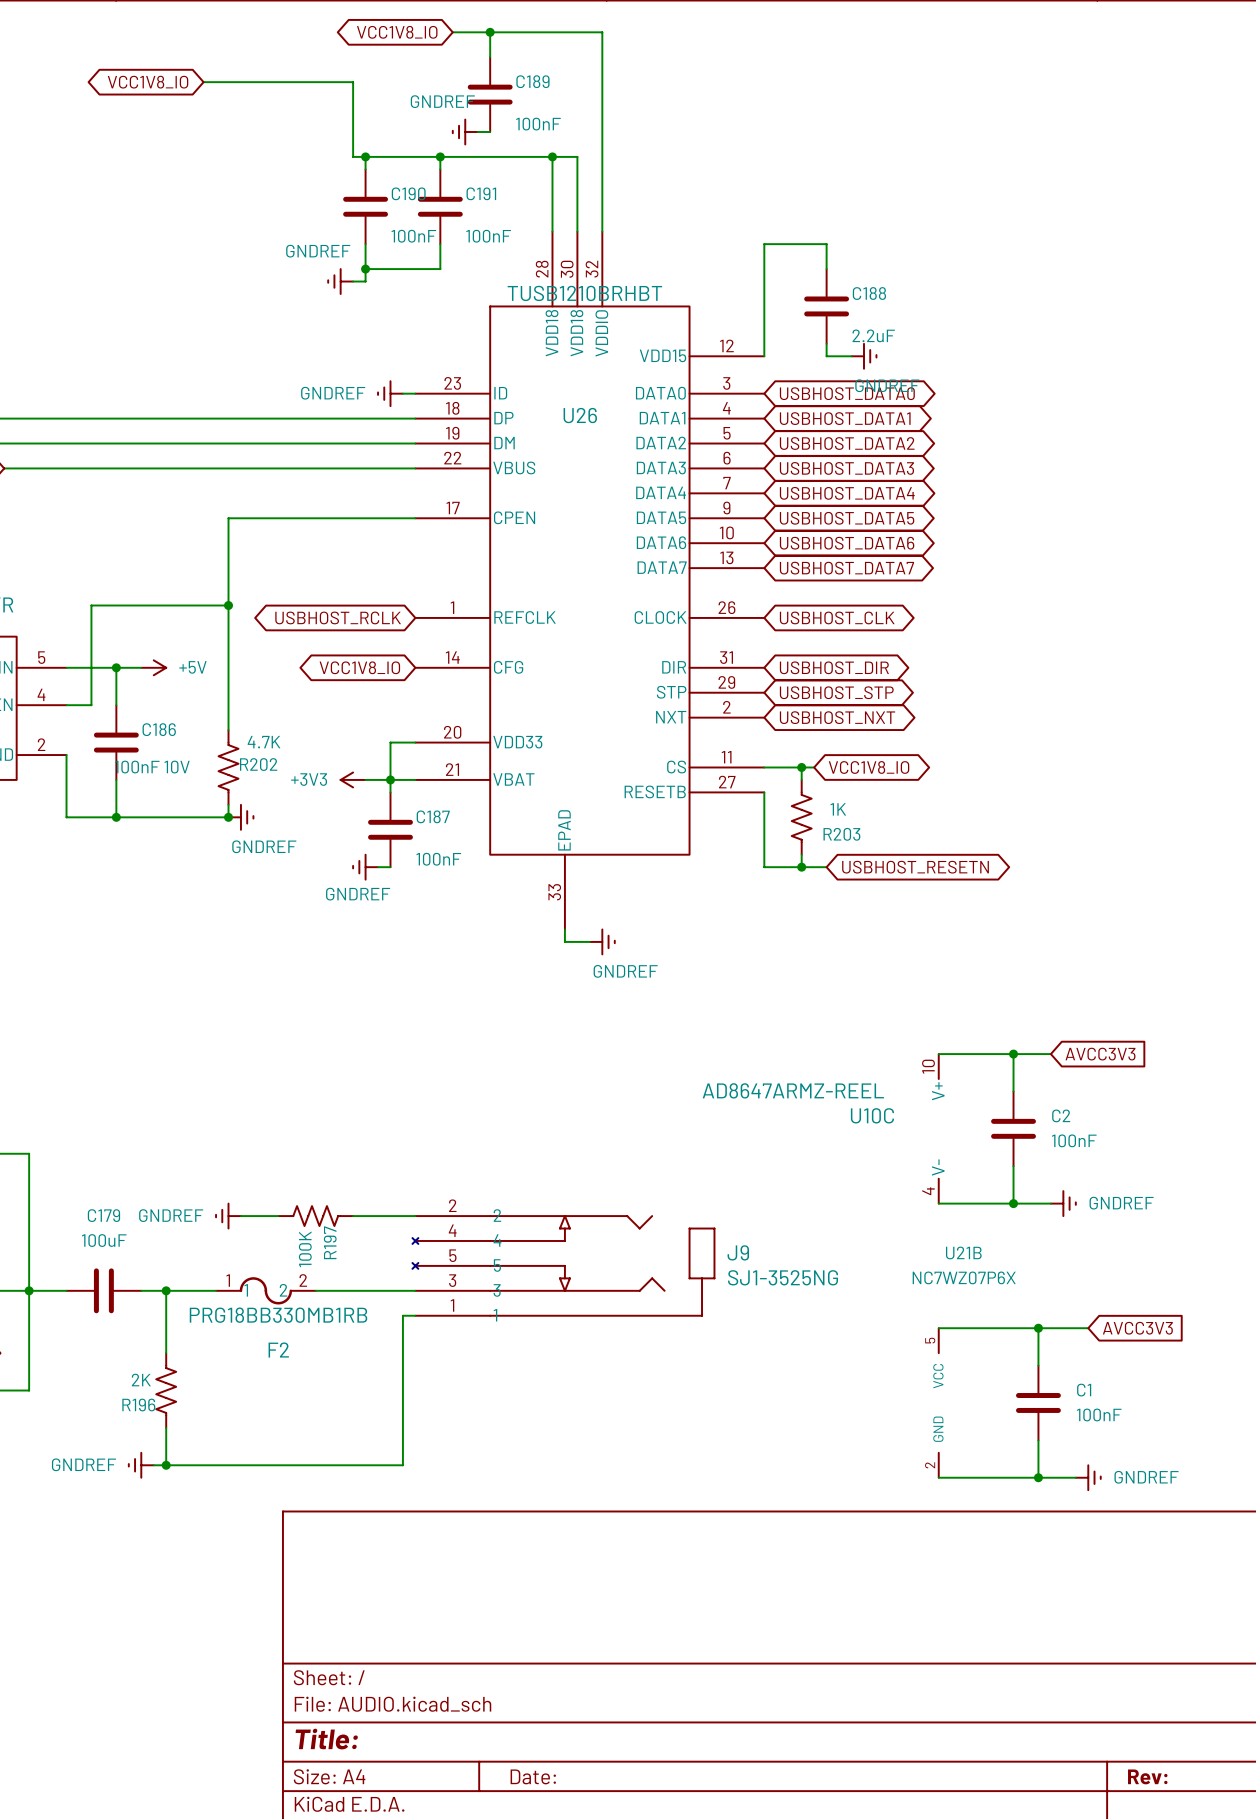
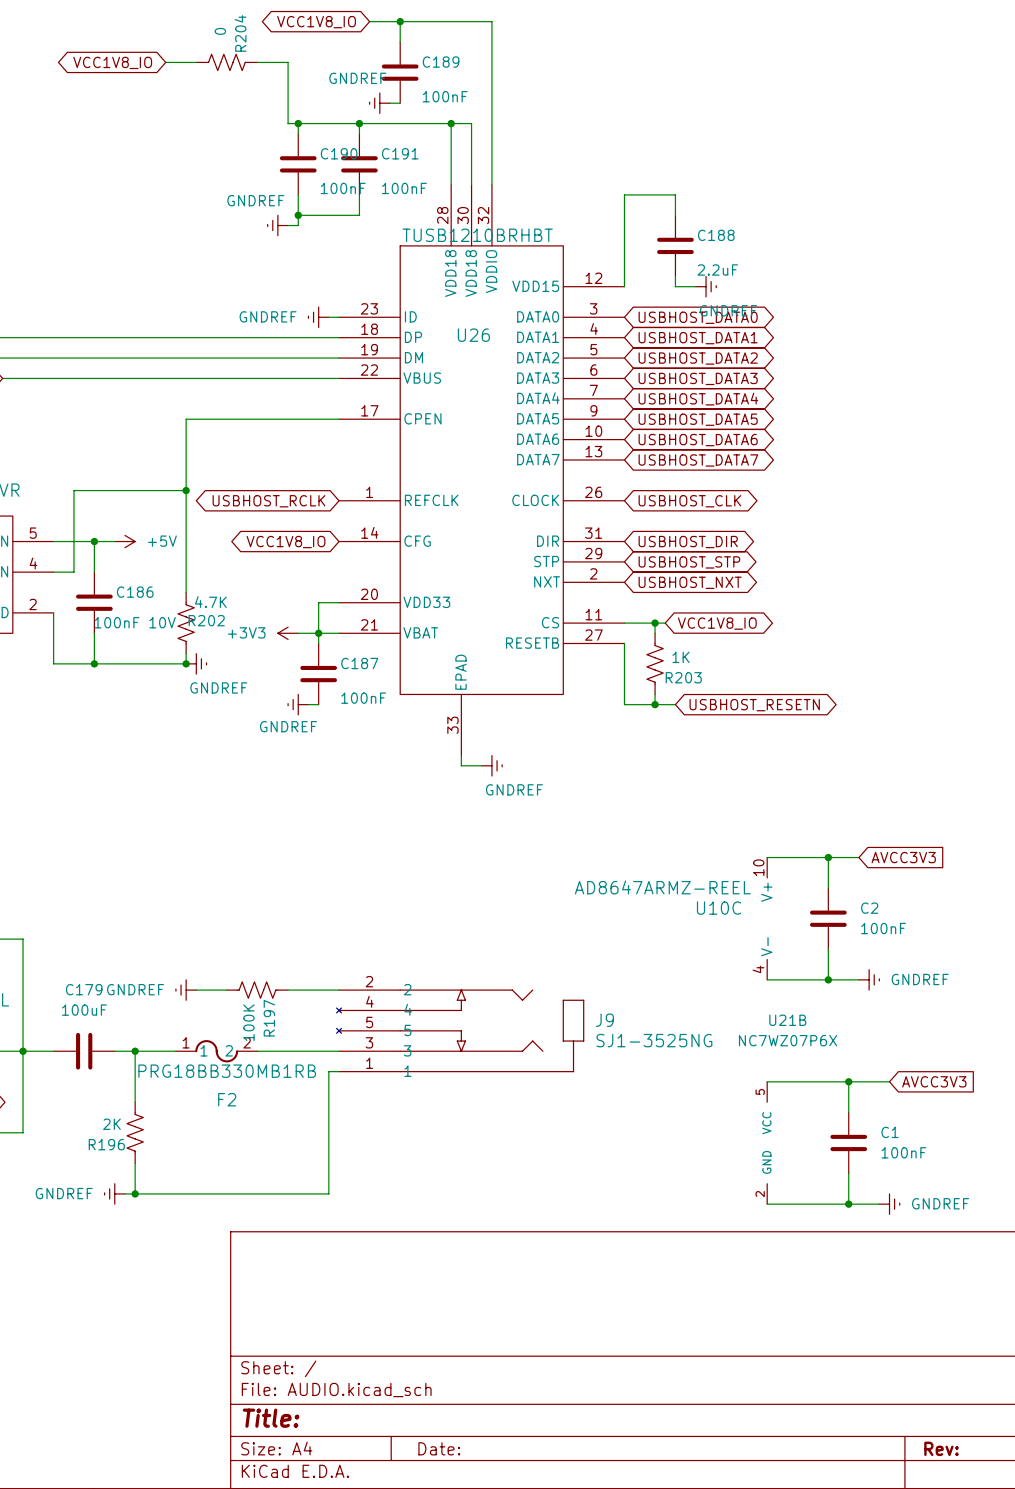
R204: none -> 0 (226, 62)

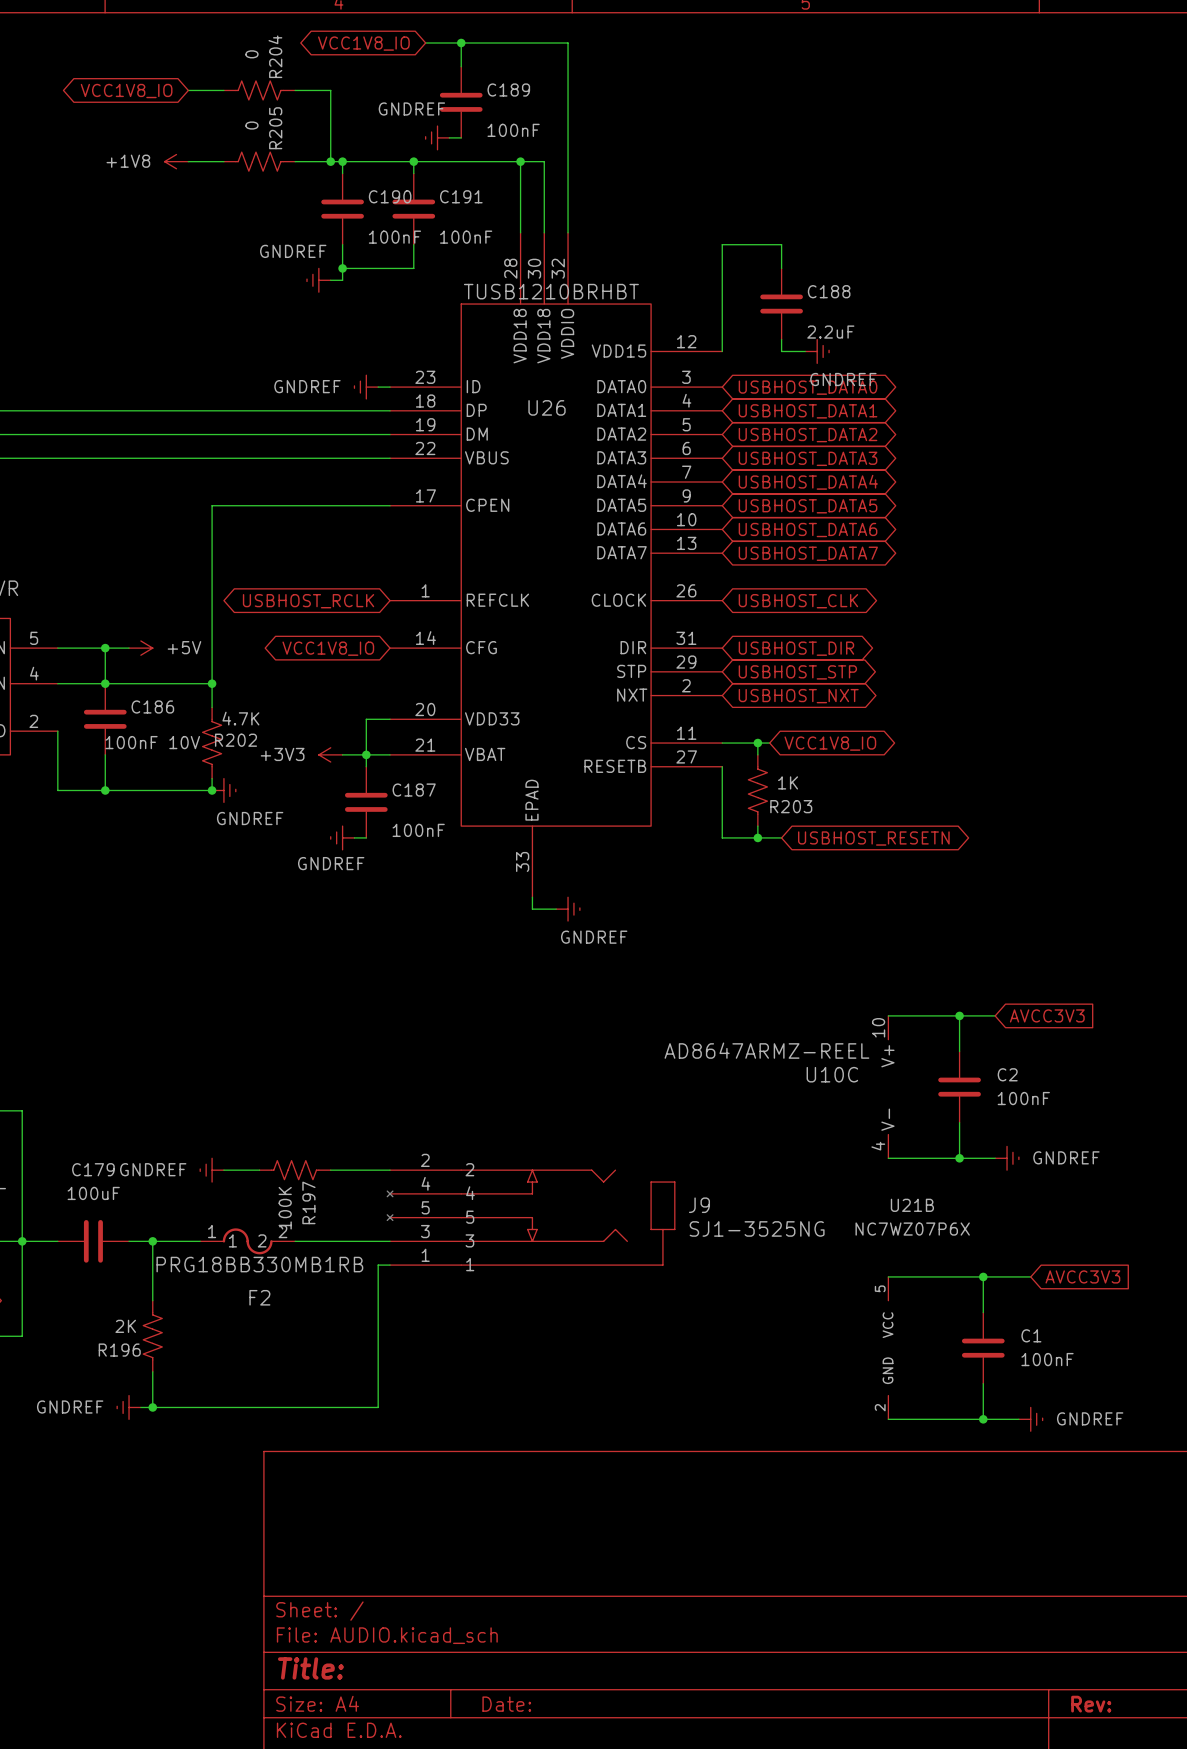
power symbol: none -> +1V8 (176, 161)
wire: none -> (188, 161) (223, 161)
R205: none -> 0 (259, 161)
wire: none -> (295, 161) (330, 161)
junction: none -> (330, 161)
wire: (186, 490) (73, 490) (73, 572) -> (212, 683) (81, 683)
junction: (186, 490) -> none
junction: none -> (105, 683)
junction: none -> (212, 683)

